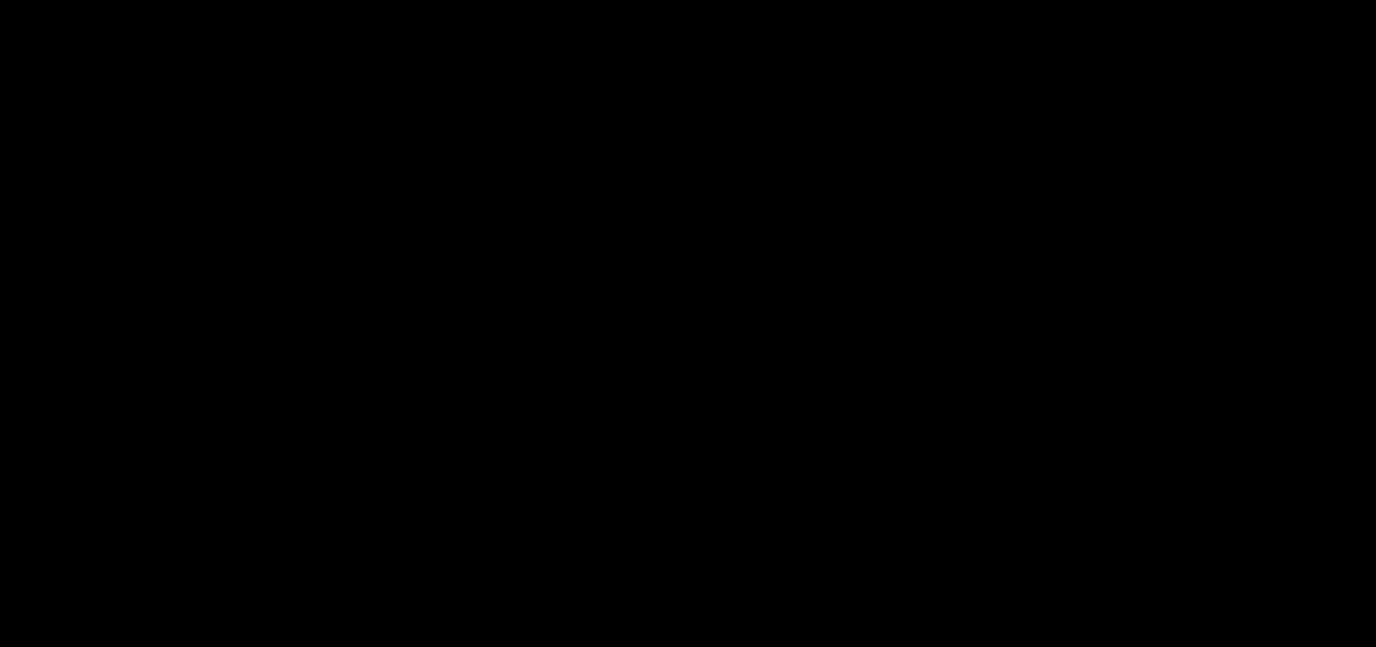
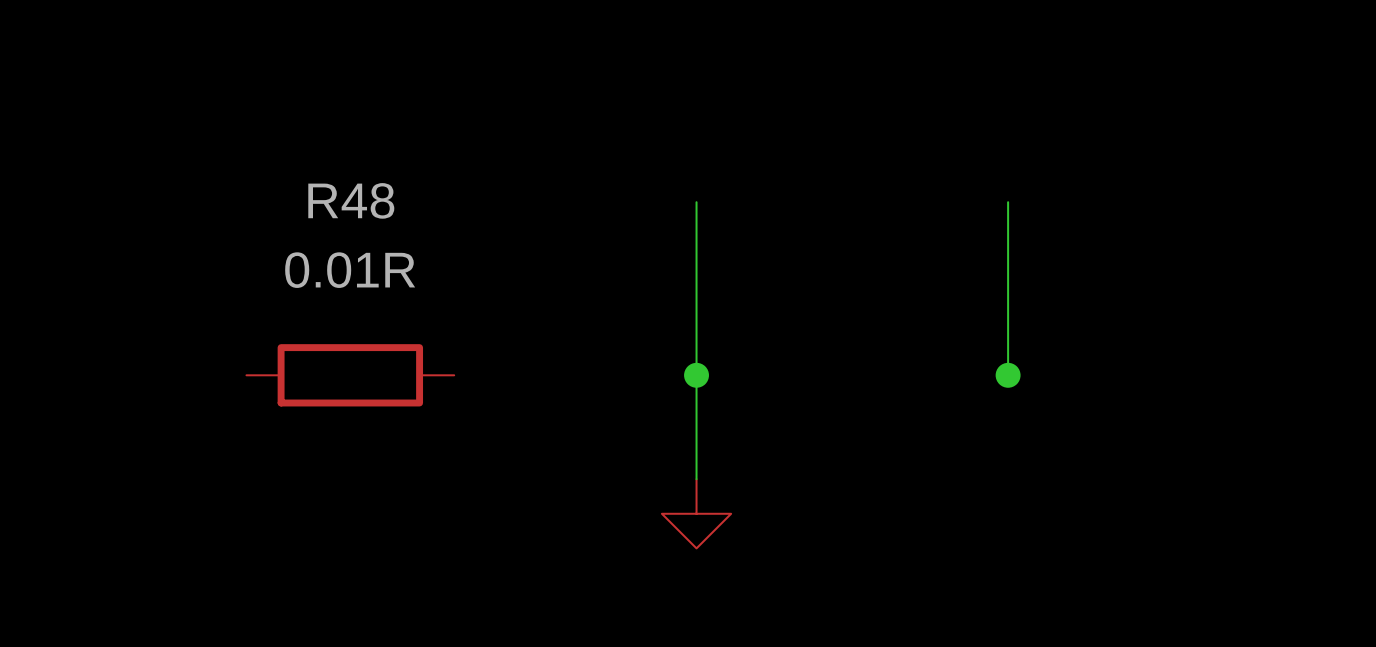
wire: none -> (696, 202) (696, 479)
wire: none -> (1008, 202) (1008, 375)
R48: none -> 0.01R (350, 375)
junction: none -> (696, 375)
junction: none -> (1008, 375)
power symbol: none -> (696, 513)

